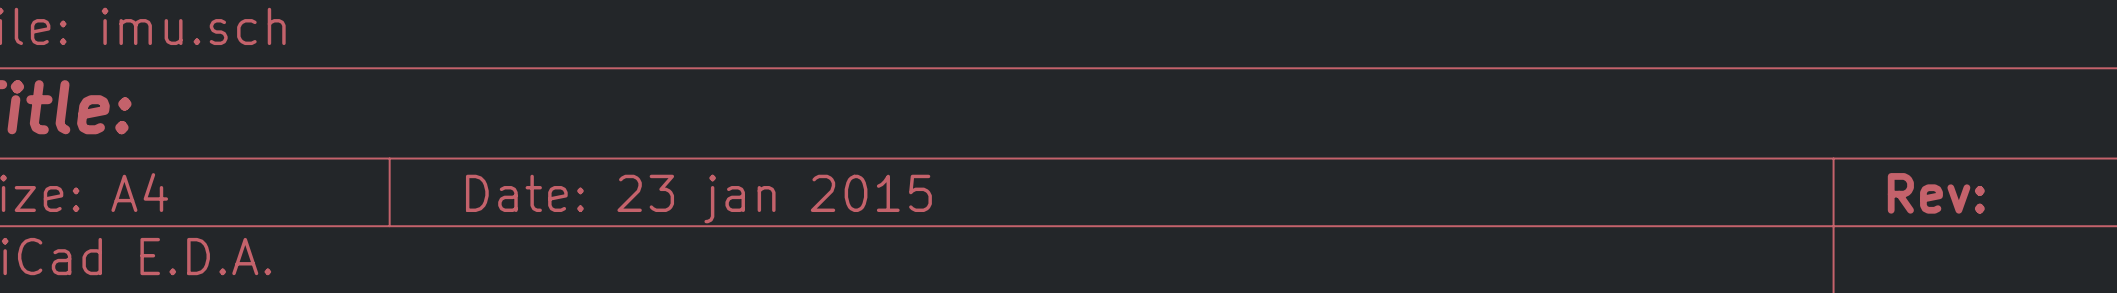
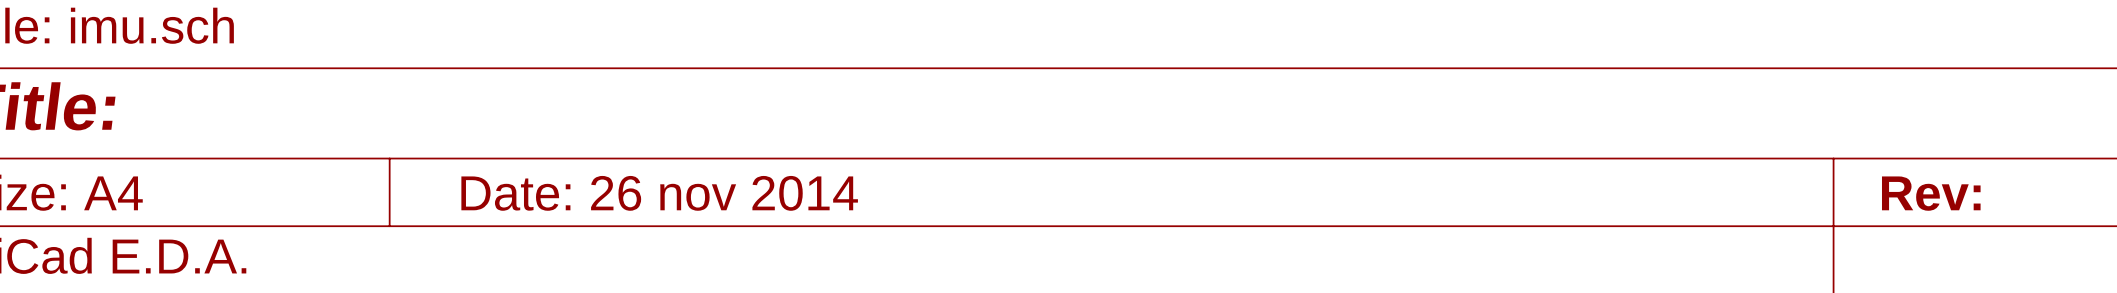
title block: Date: 23 jan 2015 (698, 199) -> Date: 26 nov 2014 (659, 193)

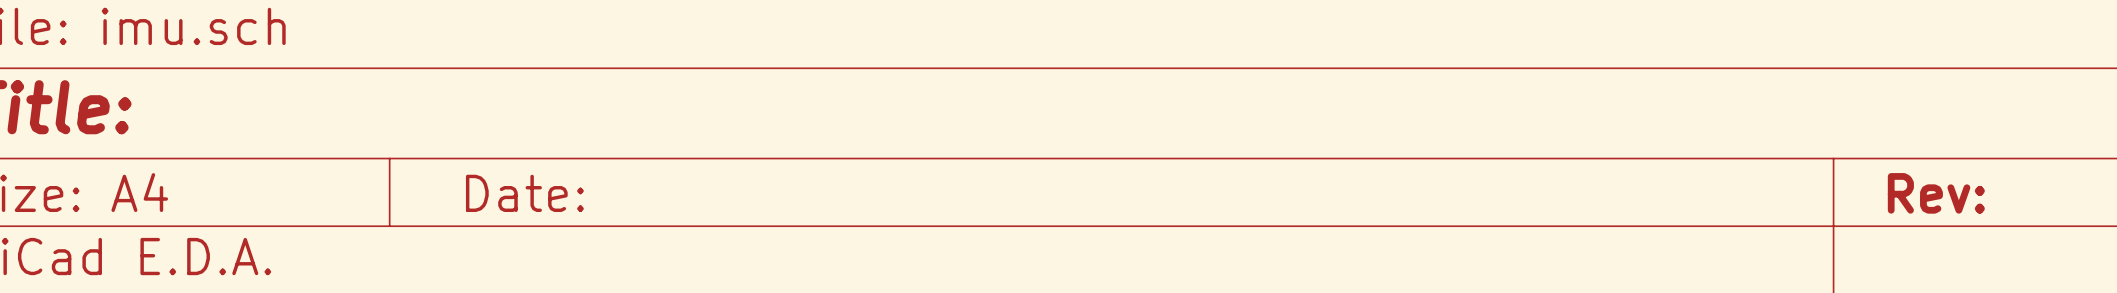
title block: Date: 26 nov 2014 (659, 193) -> Date: (524, 193)

